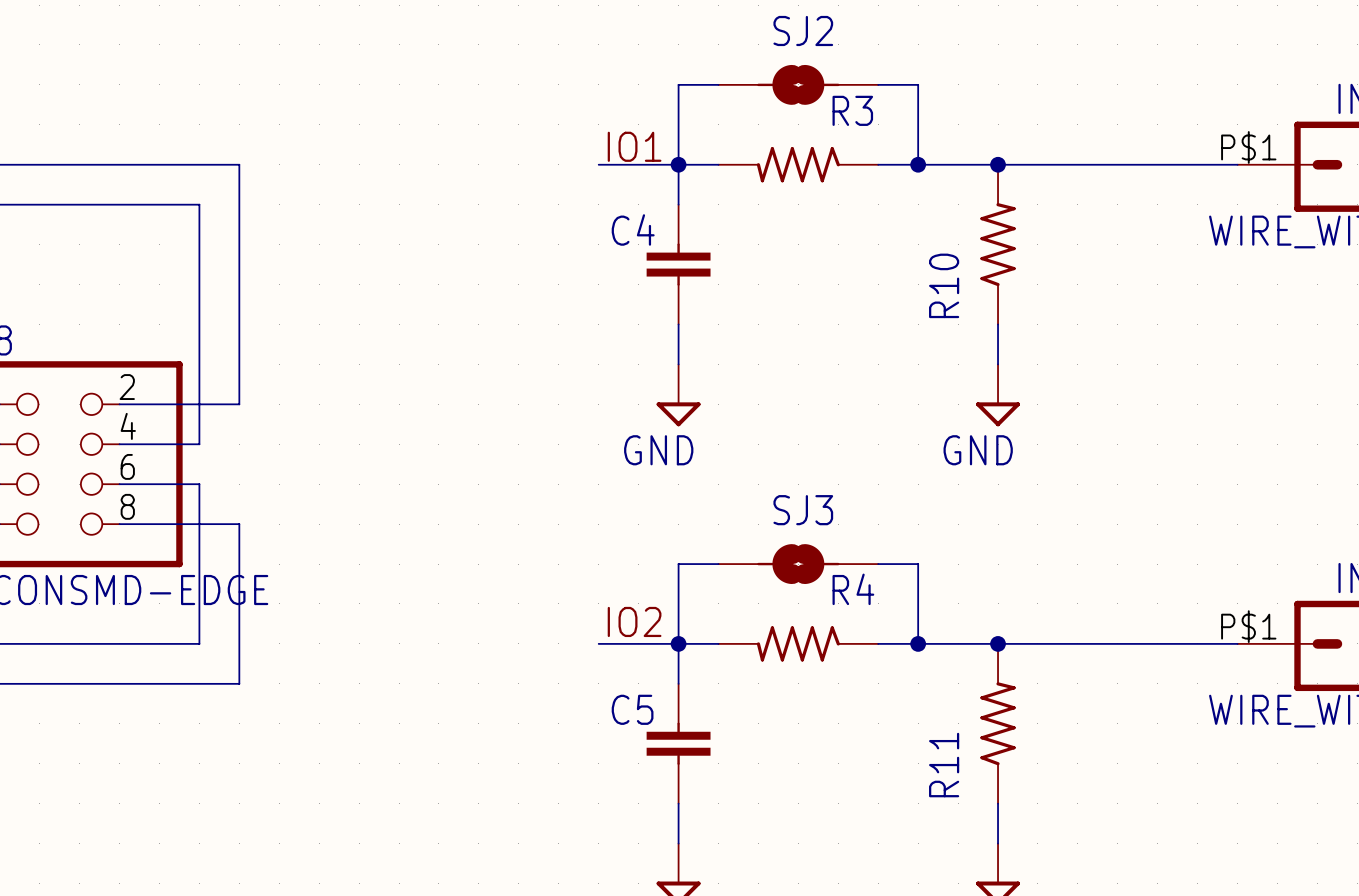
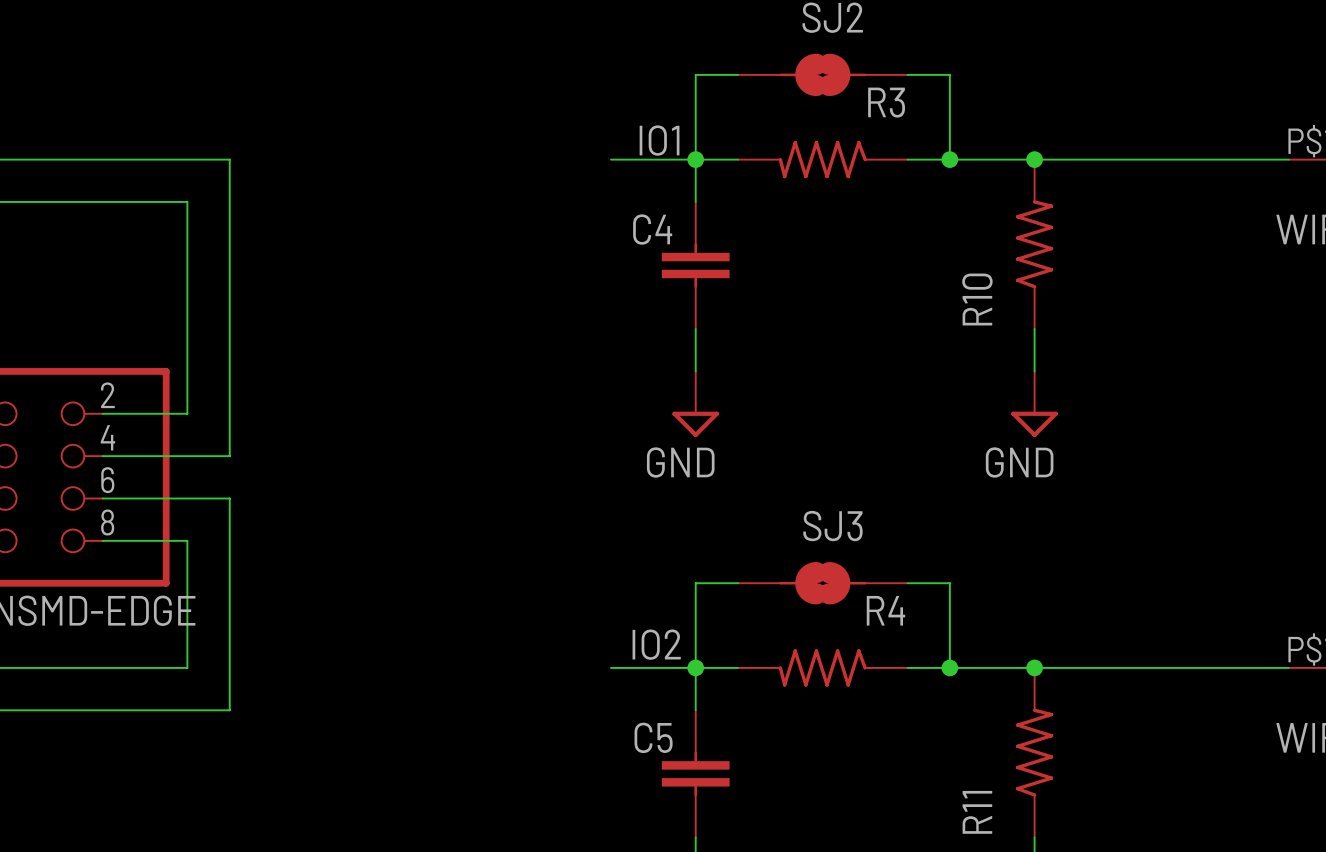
wire: (239, 404) (199, 404) (199, 444) -> (229, 413) (229, 456) (187, 456)
wire: (199, 484) (199, 524) (239, 524) -> (187, 498) (229, 498) (229, 540)

